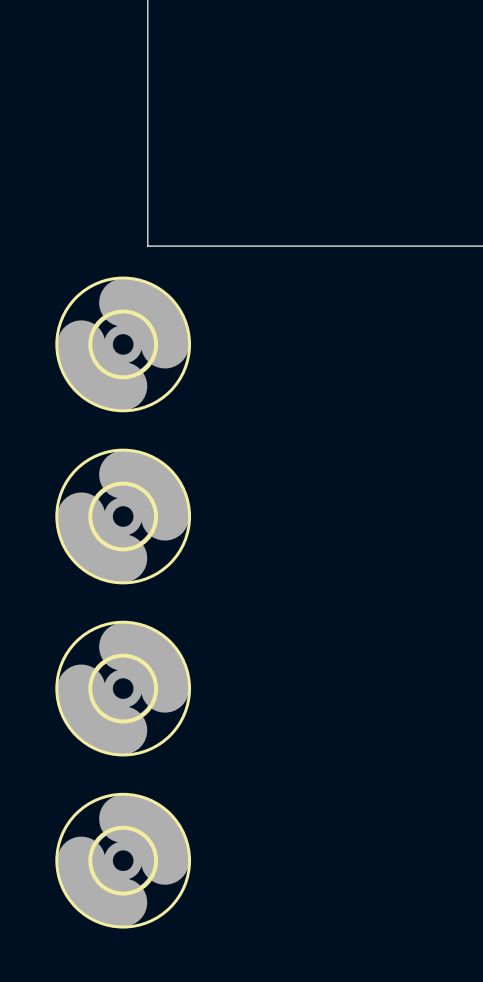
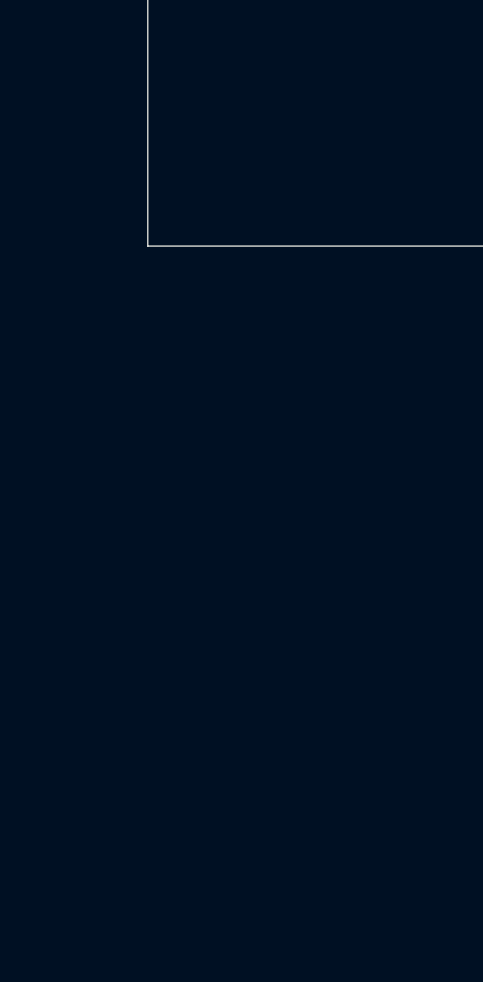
part: (123, 344) -> none
part: (123, 516) -> none
part: (123, 688) -> none
part: (123, 860) -> none

